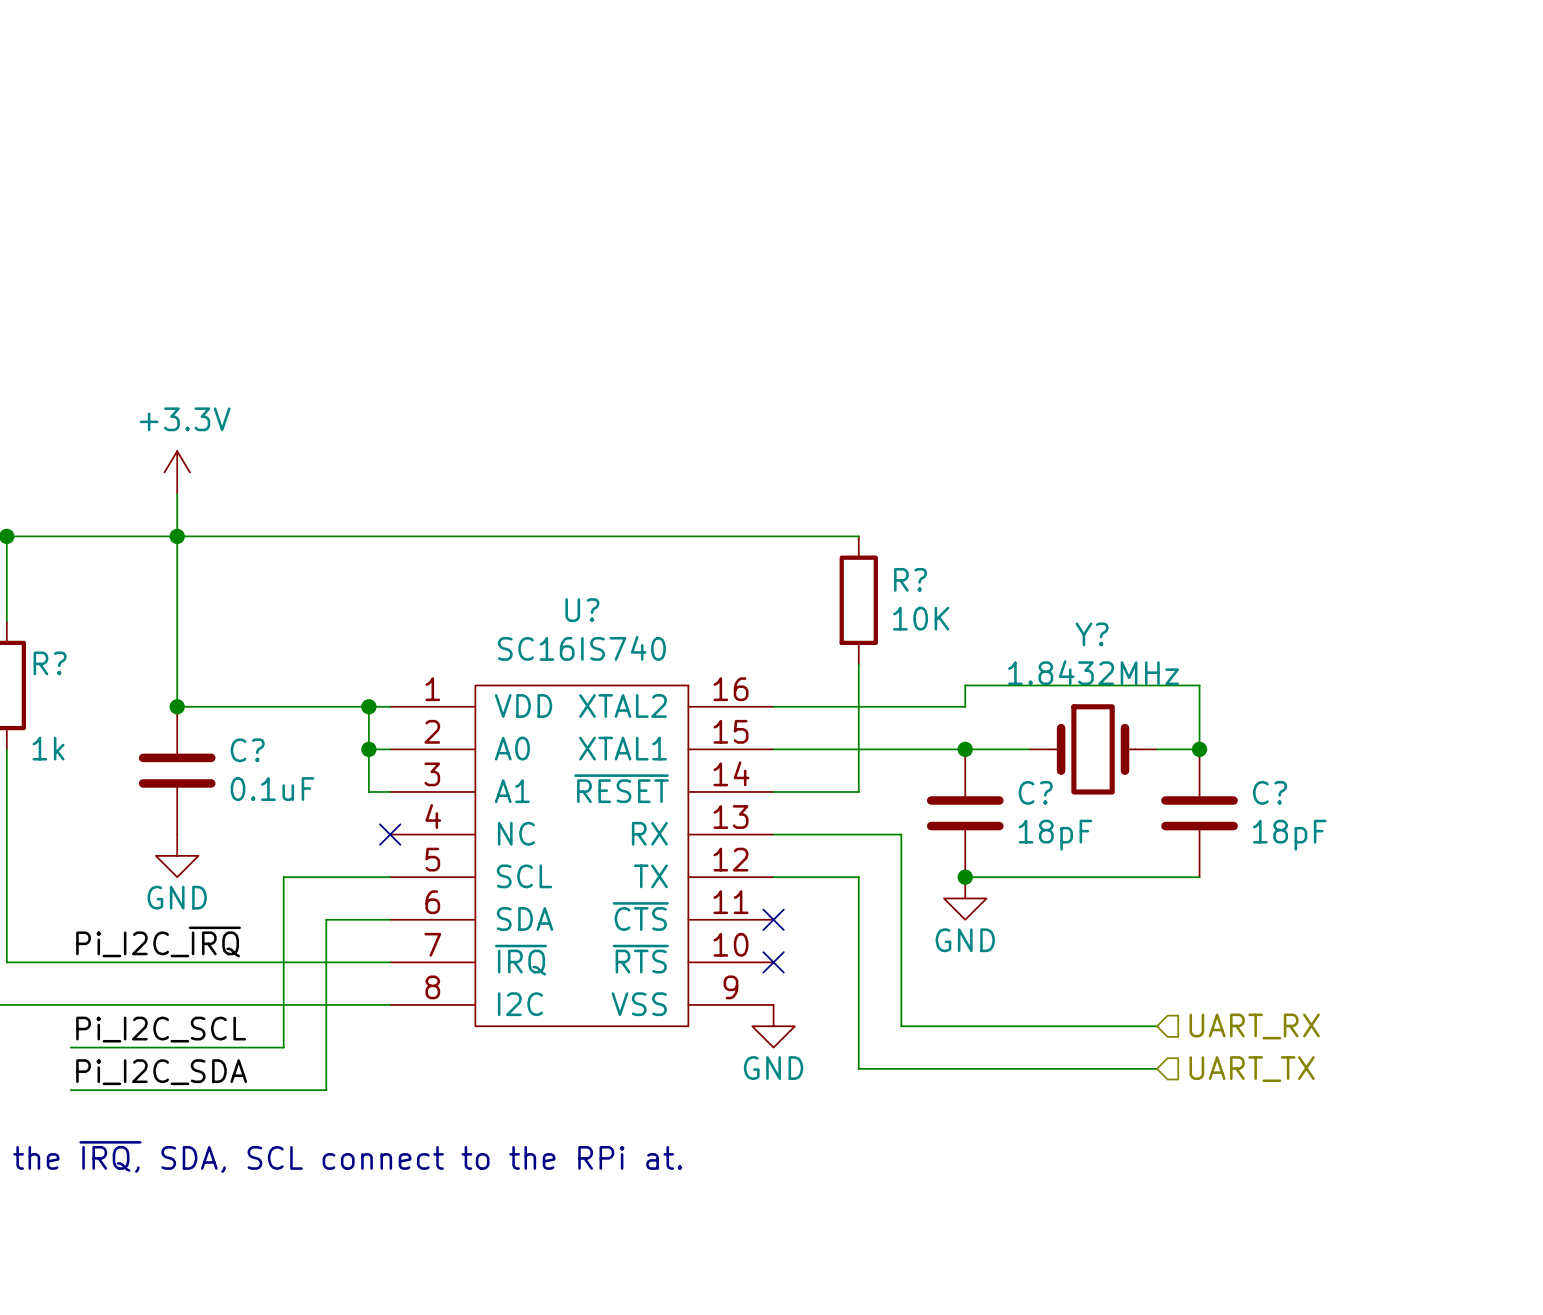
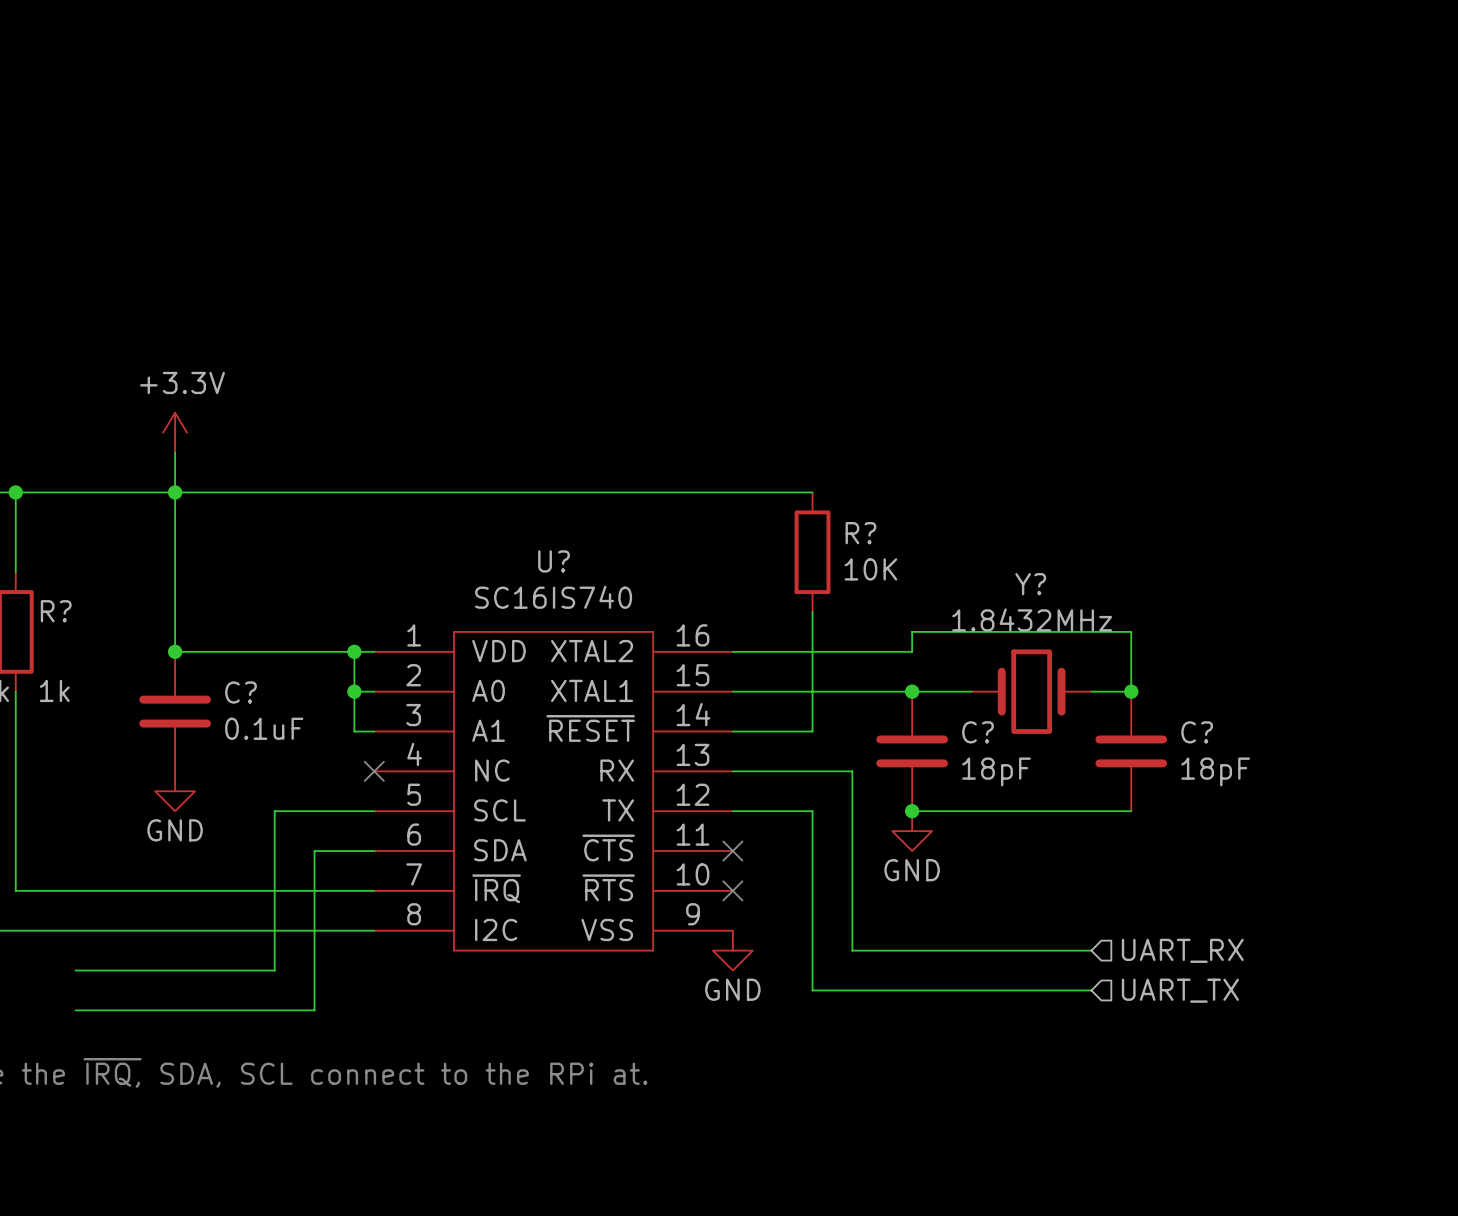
label: Pi_I2C_~{IRQ} (158, 941) -> none
label: Pi_I2C_SCL (161, 1029) -> none
label: Pi_I2C_SDA (161, 1072) -> none

